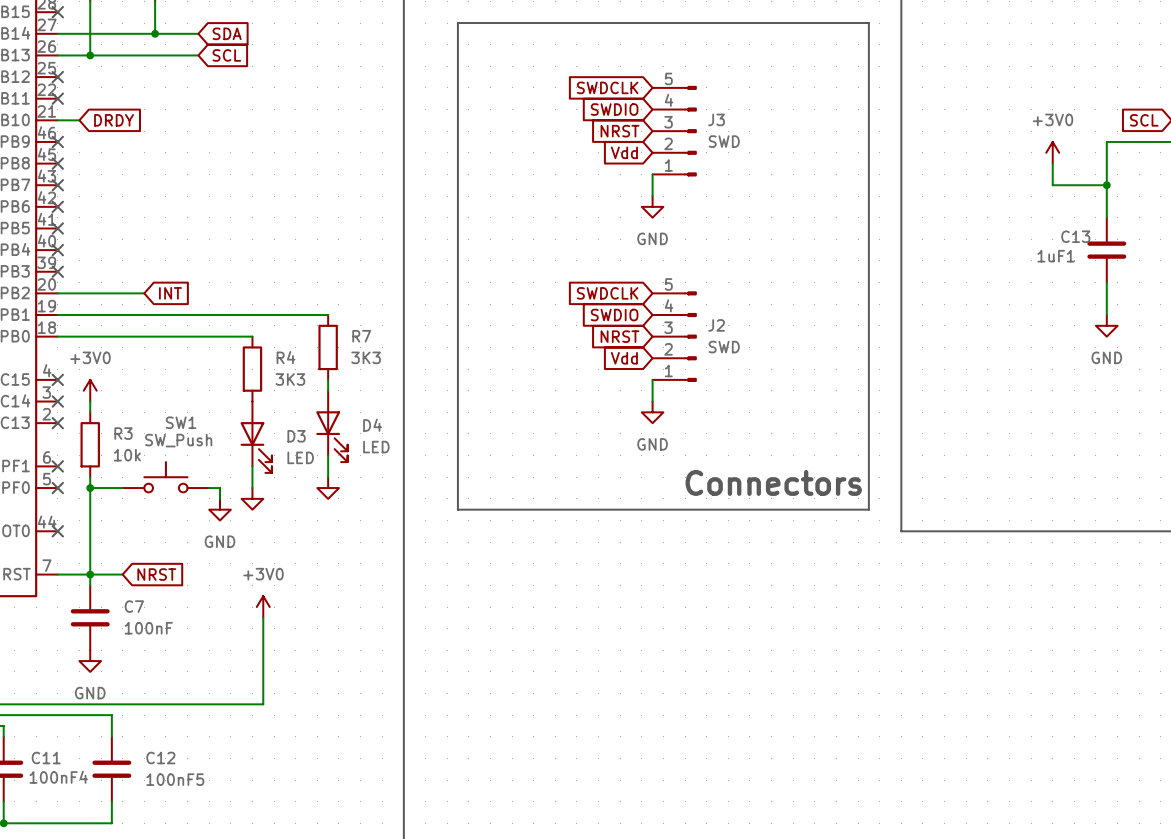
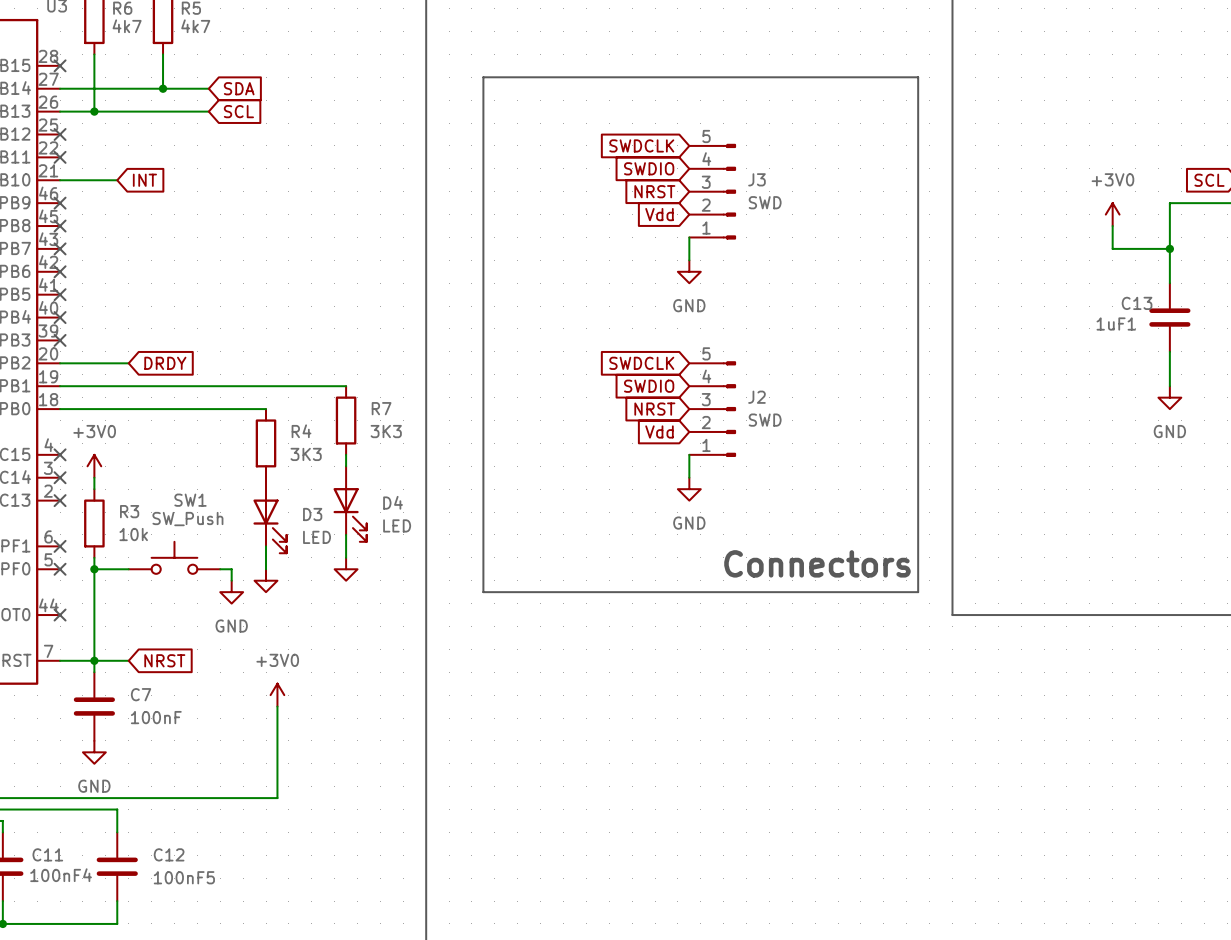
wire: none -> (82, 180) (117, 180)
global label position: DRDY (114, 120) -> DRDY (165, 363)
wire: (122, 293) (144, 293) -> none
global label position: INT (170, 293) -> INT (144, 180)

